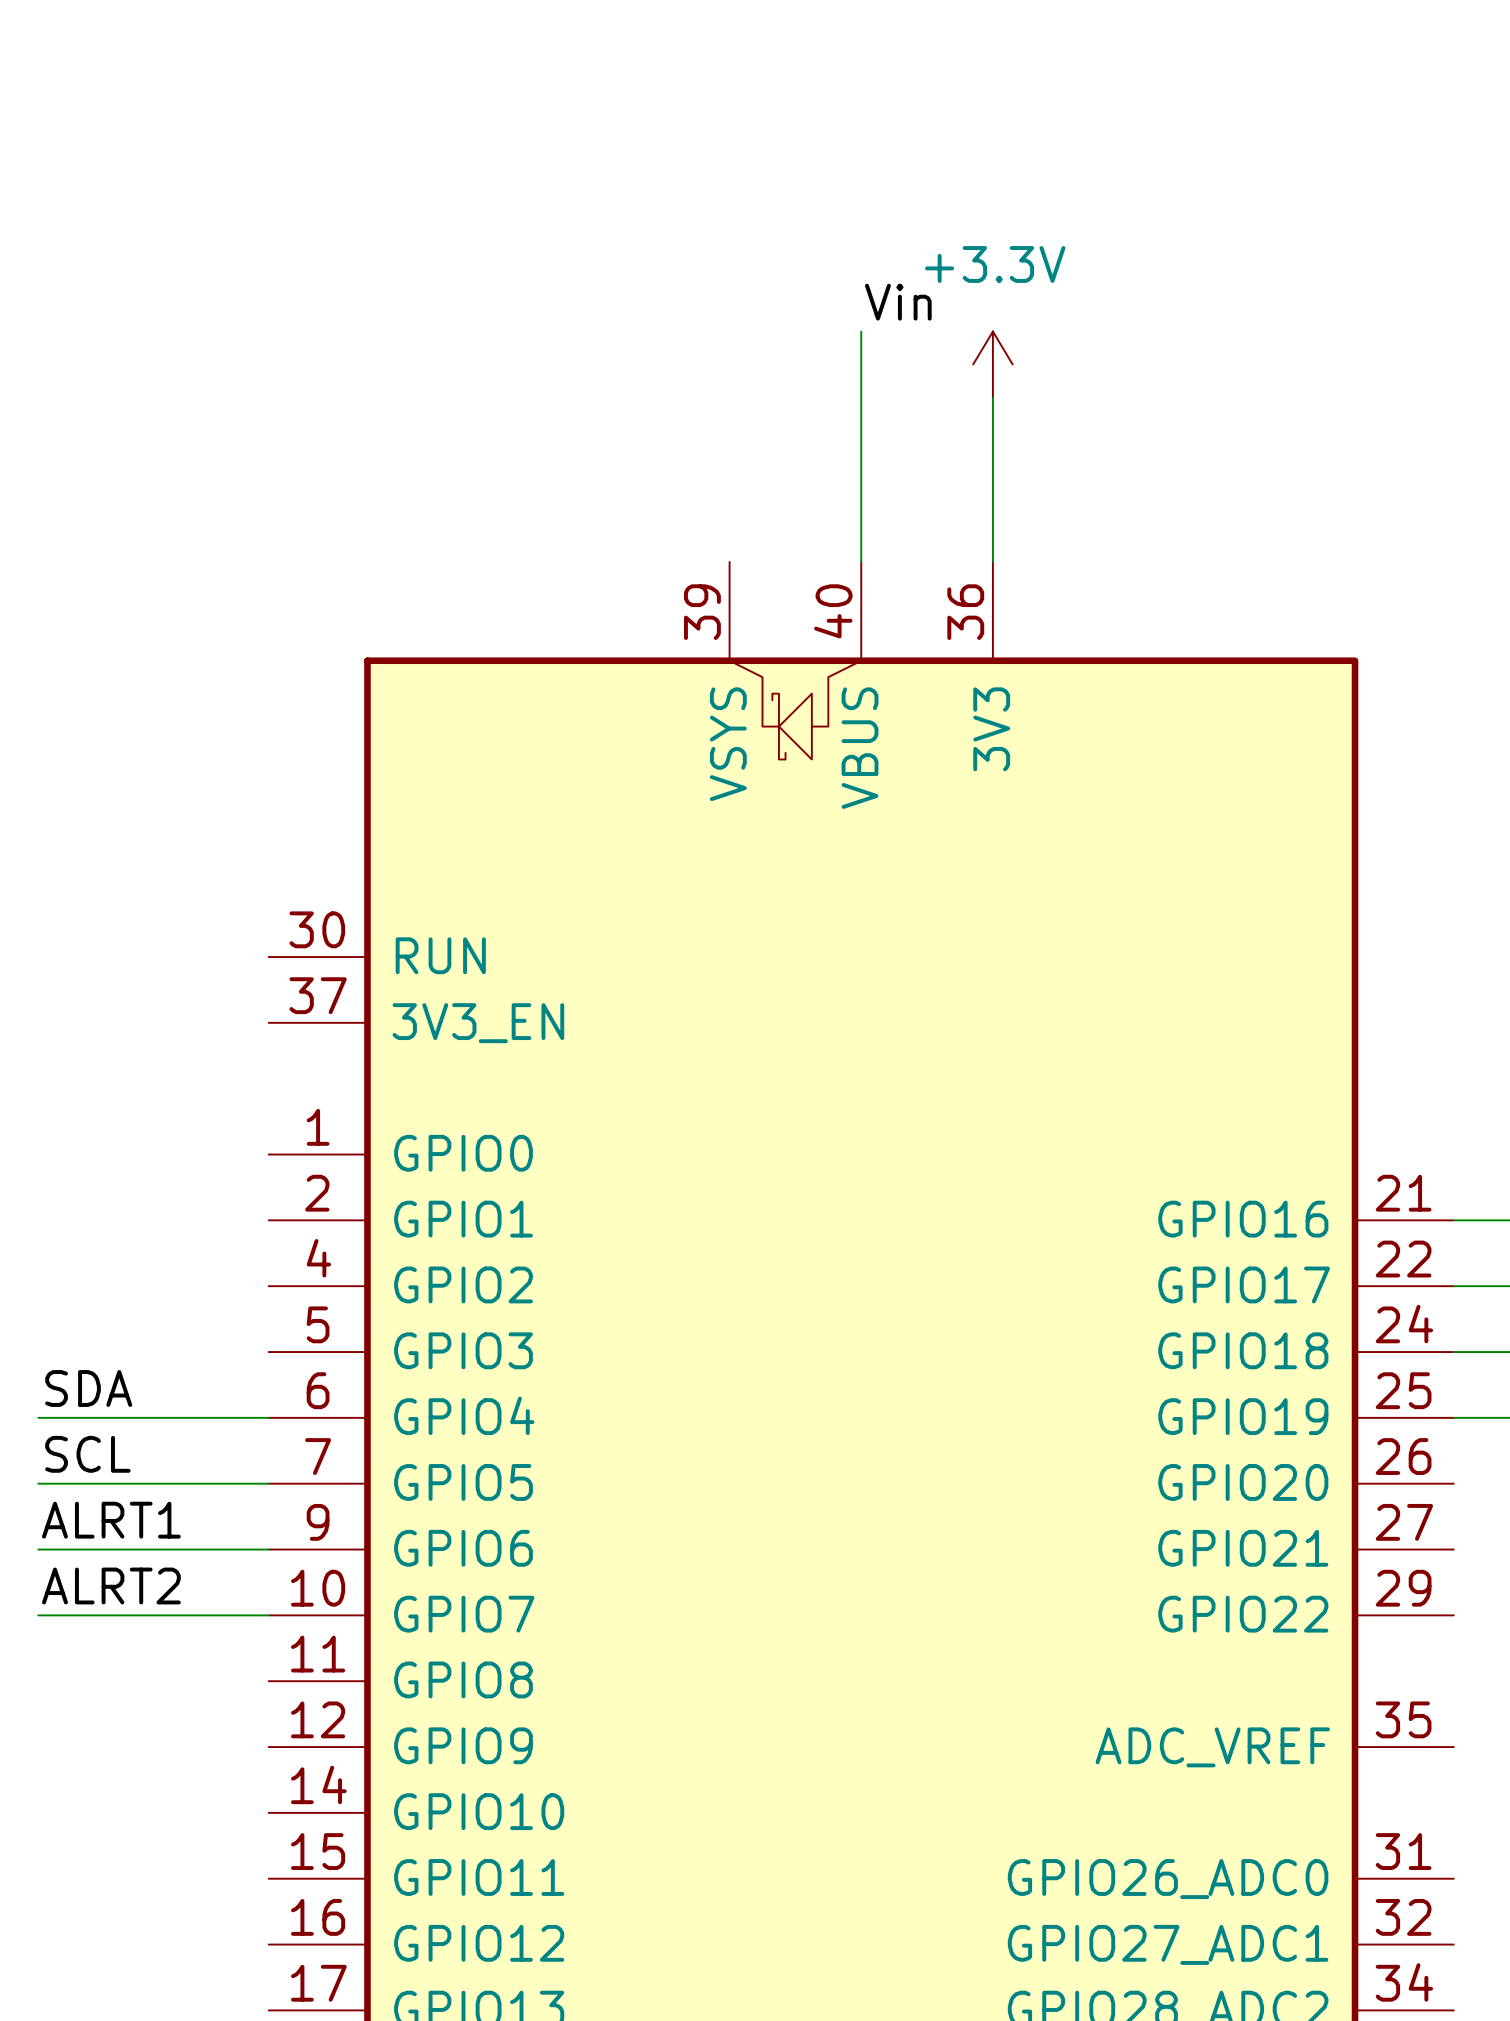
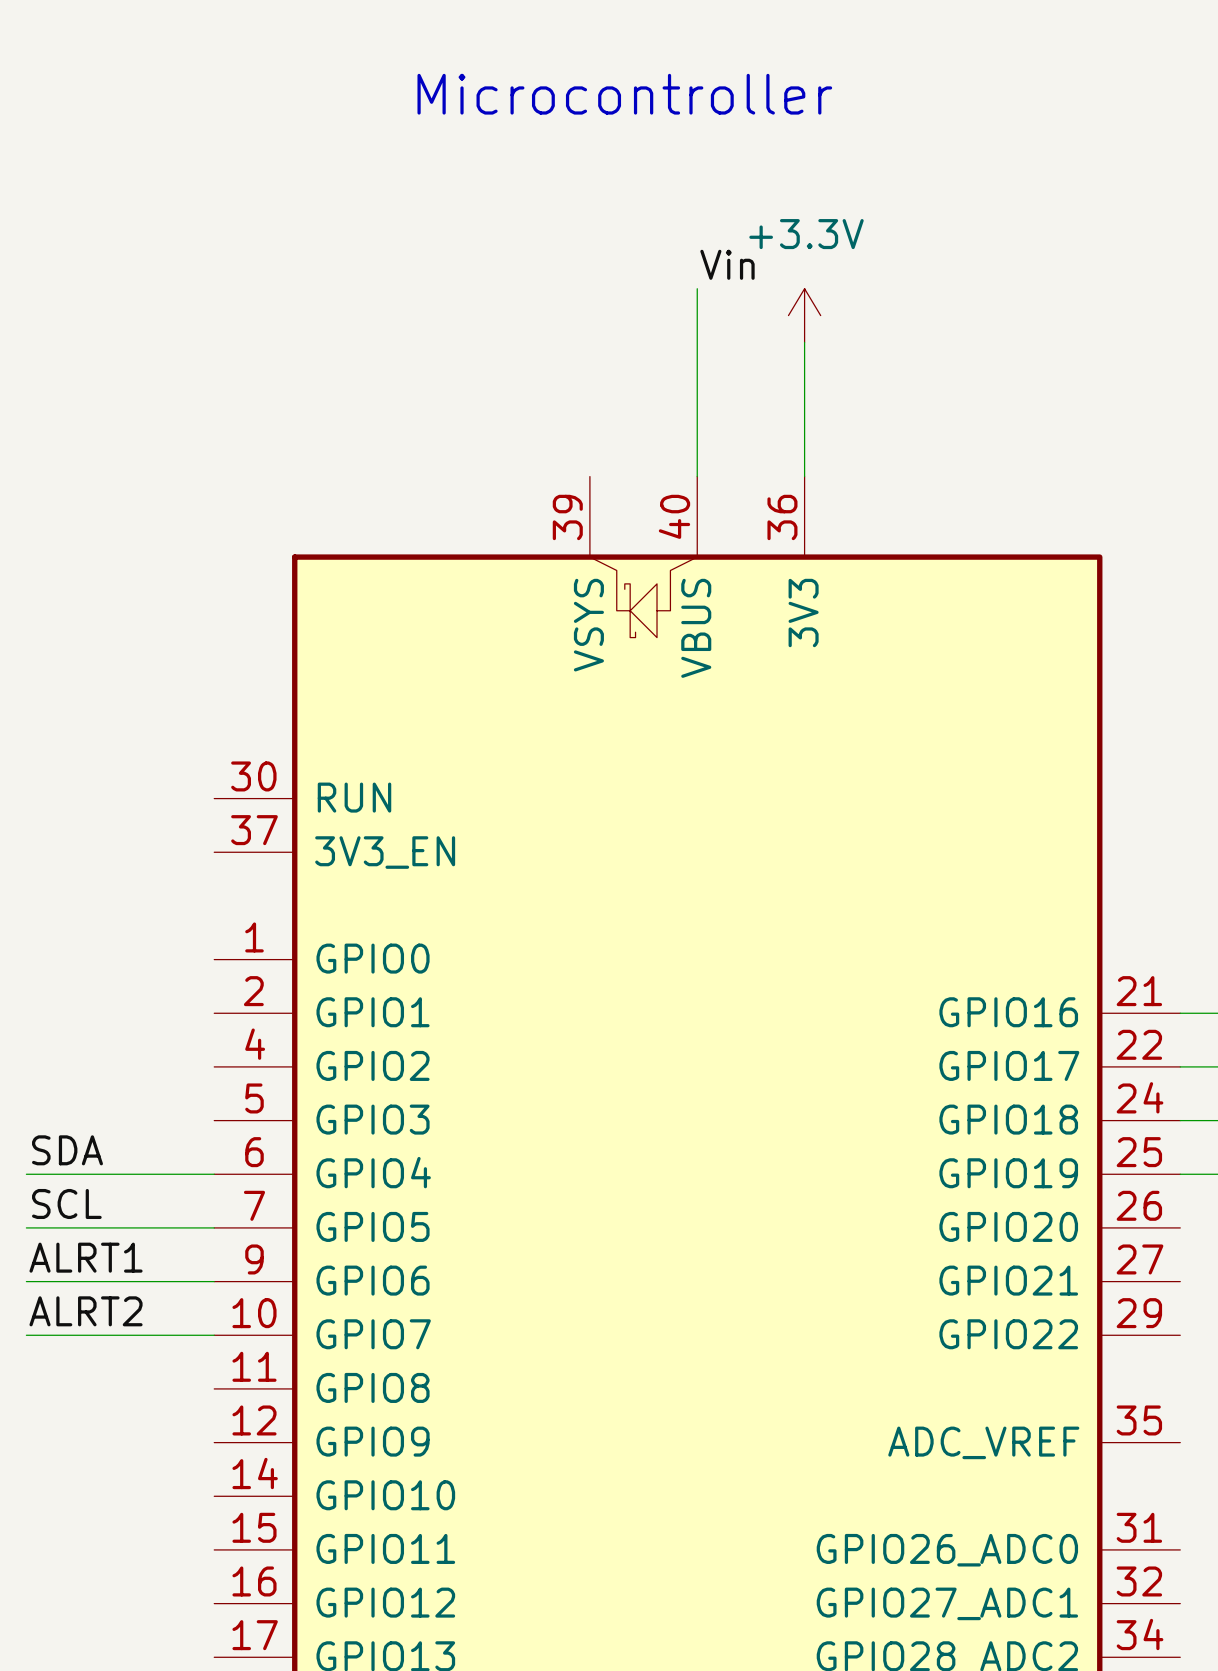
text: none -> Microcontroller (624, 94)

